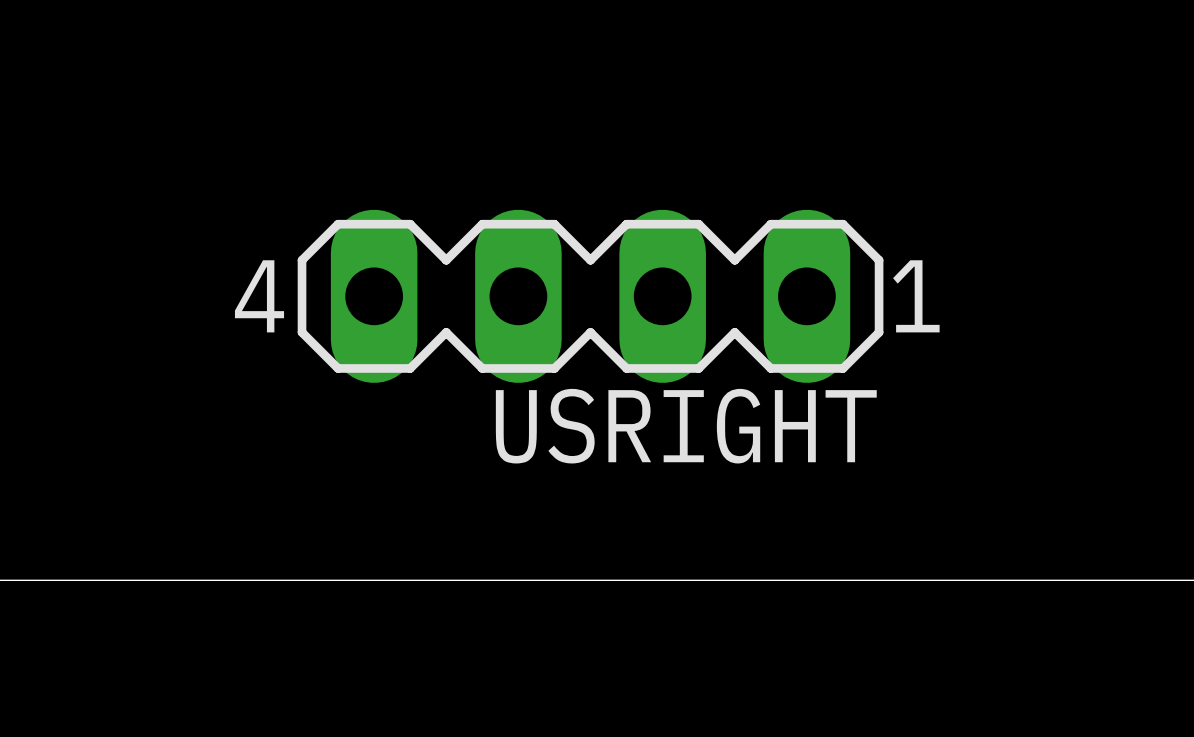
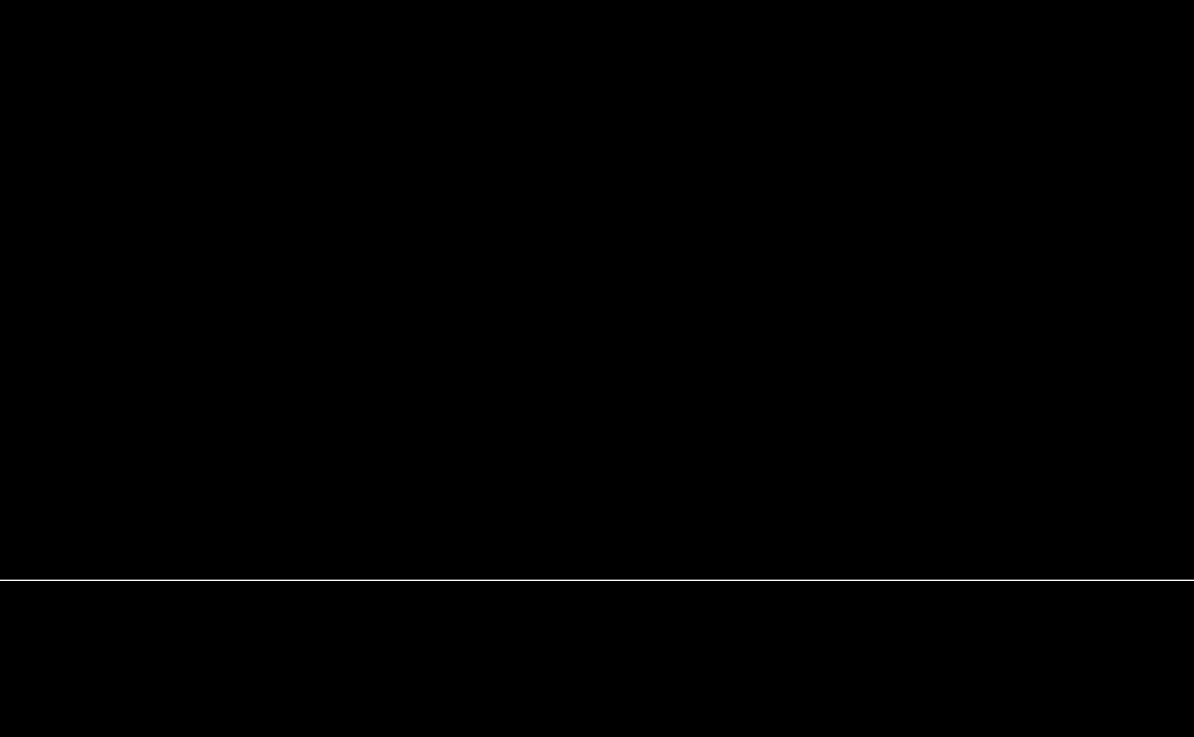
USRIGHT: (590, 296) -> none

